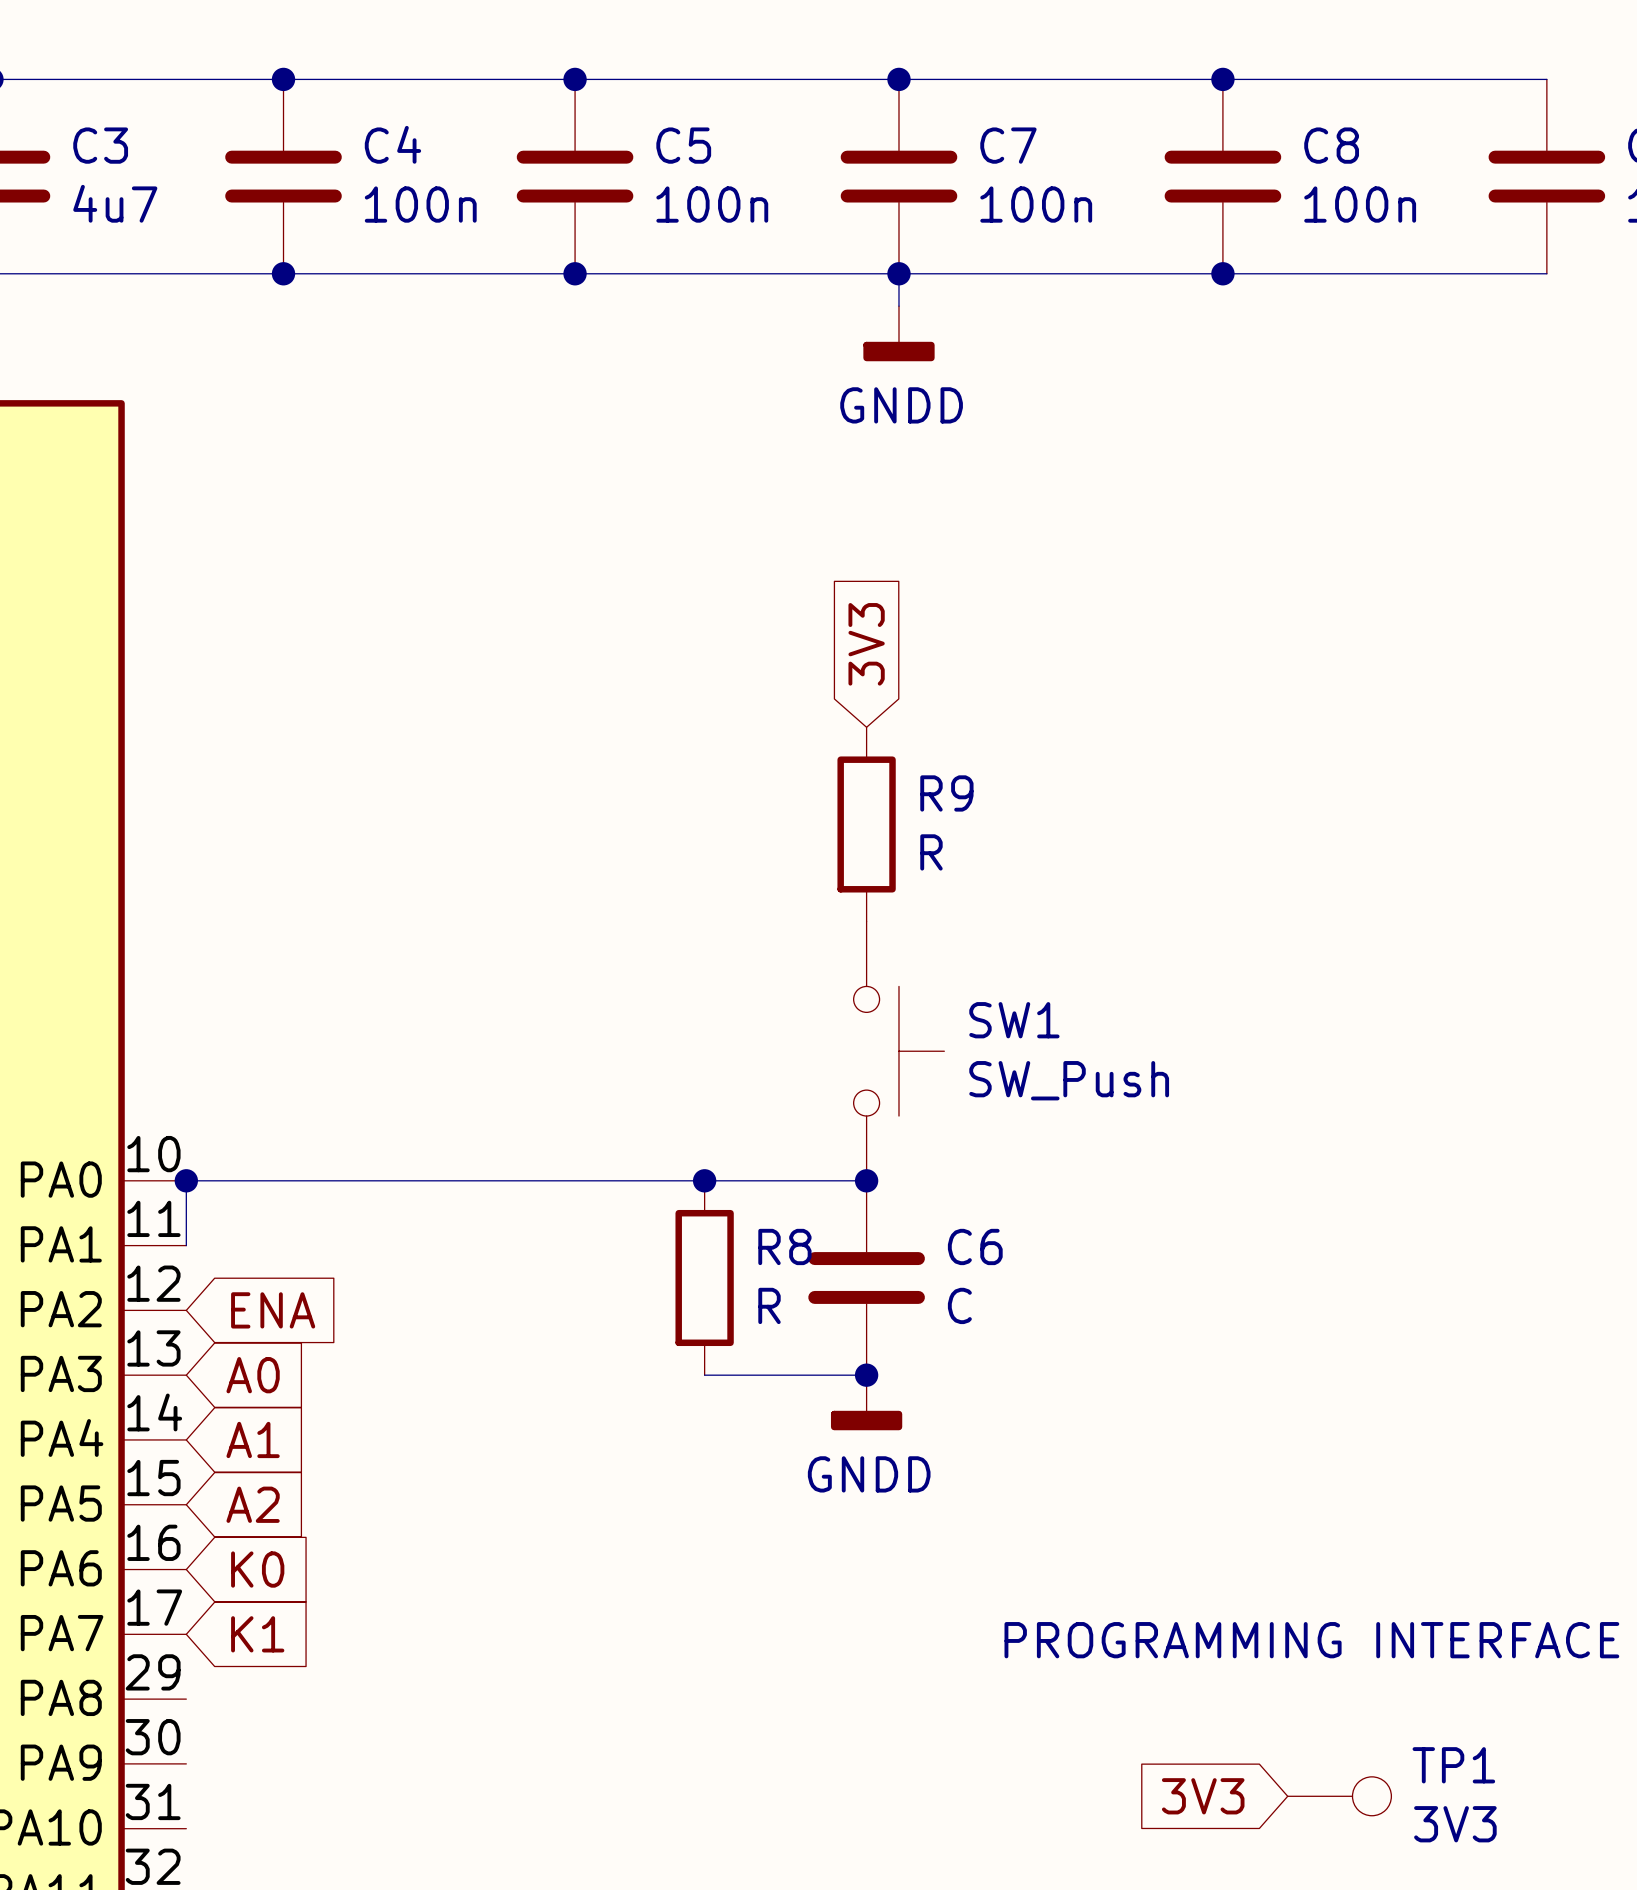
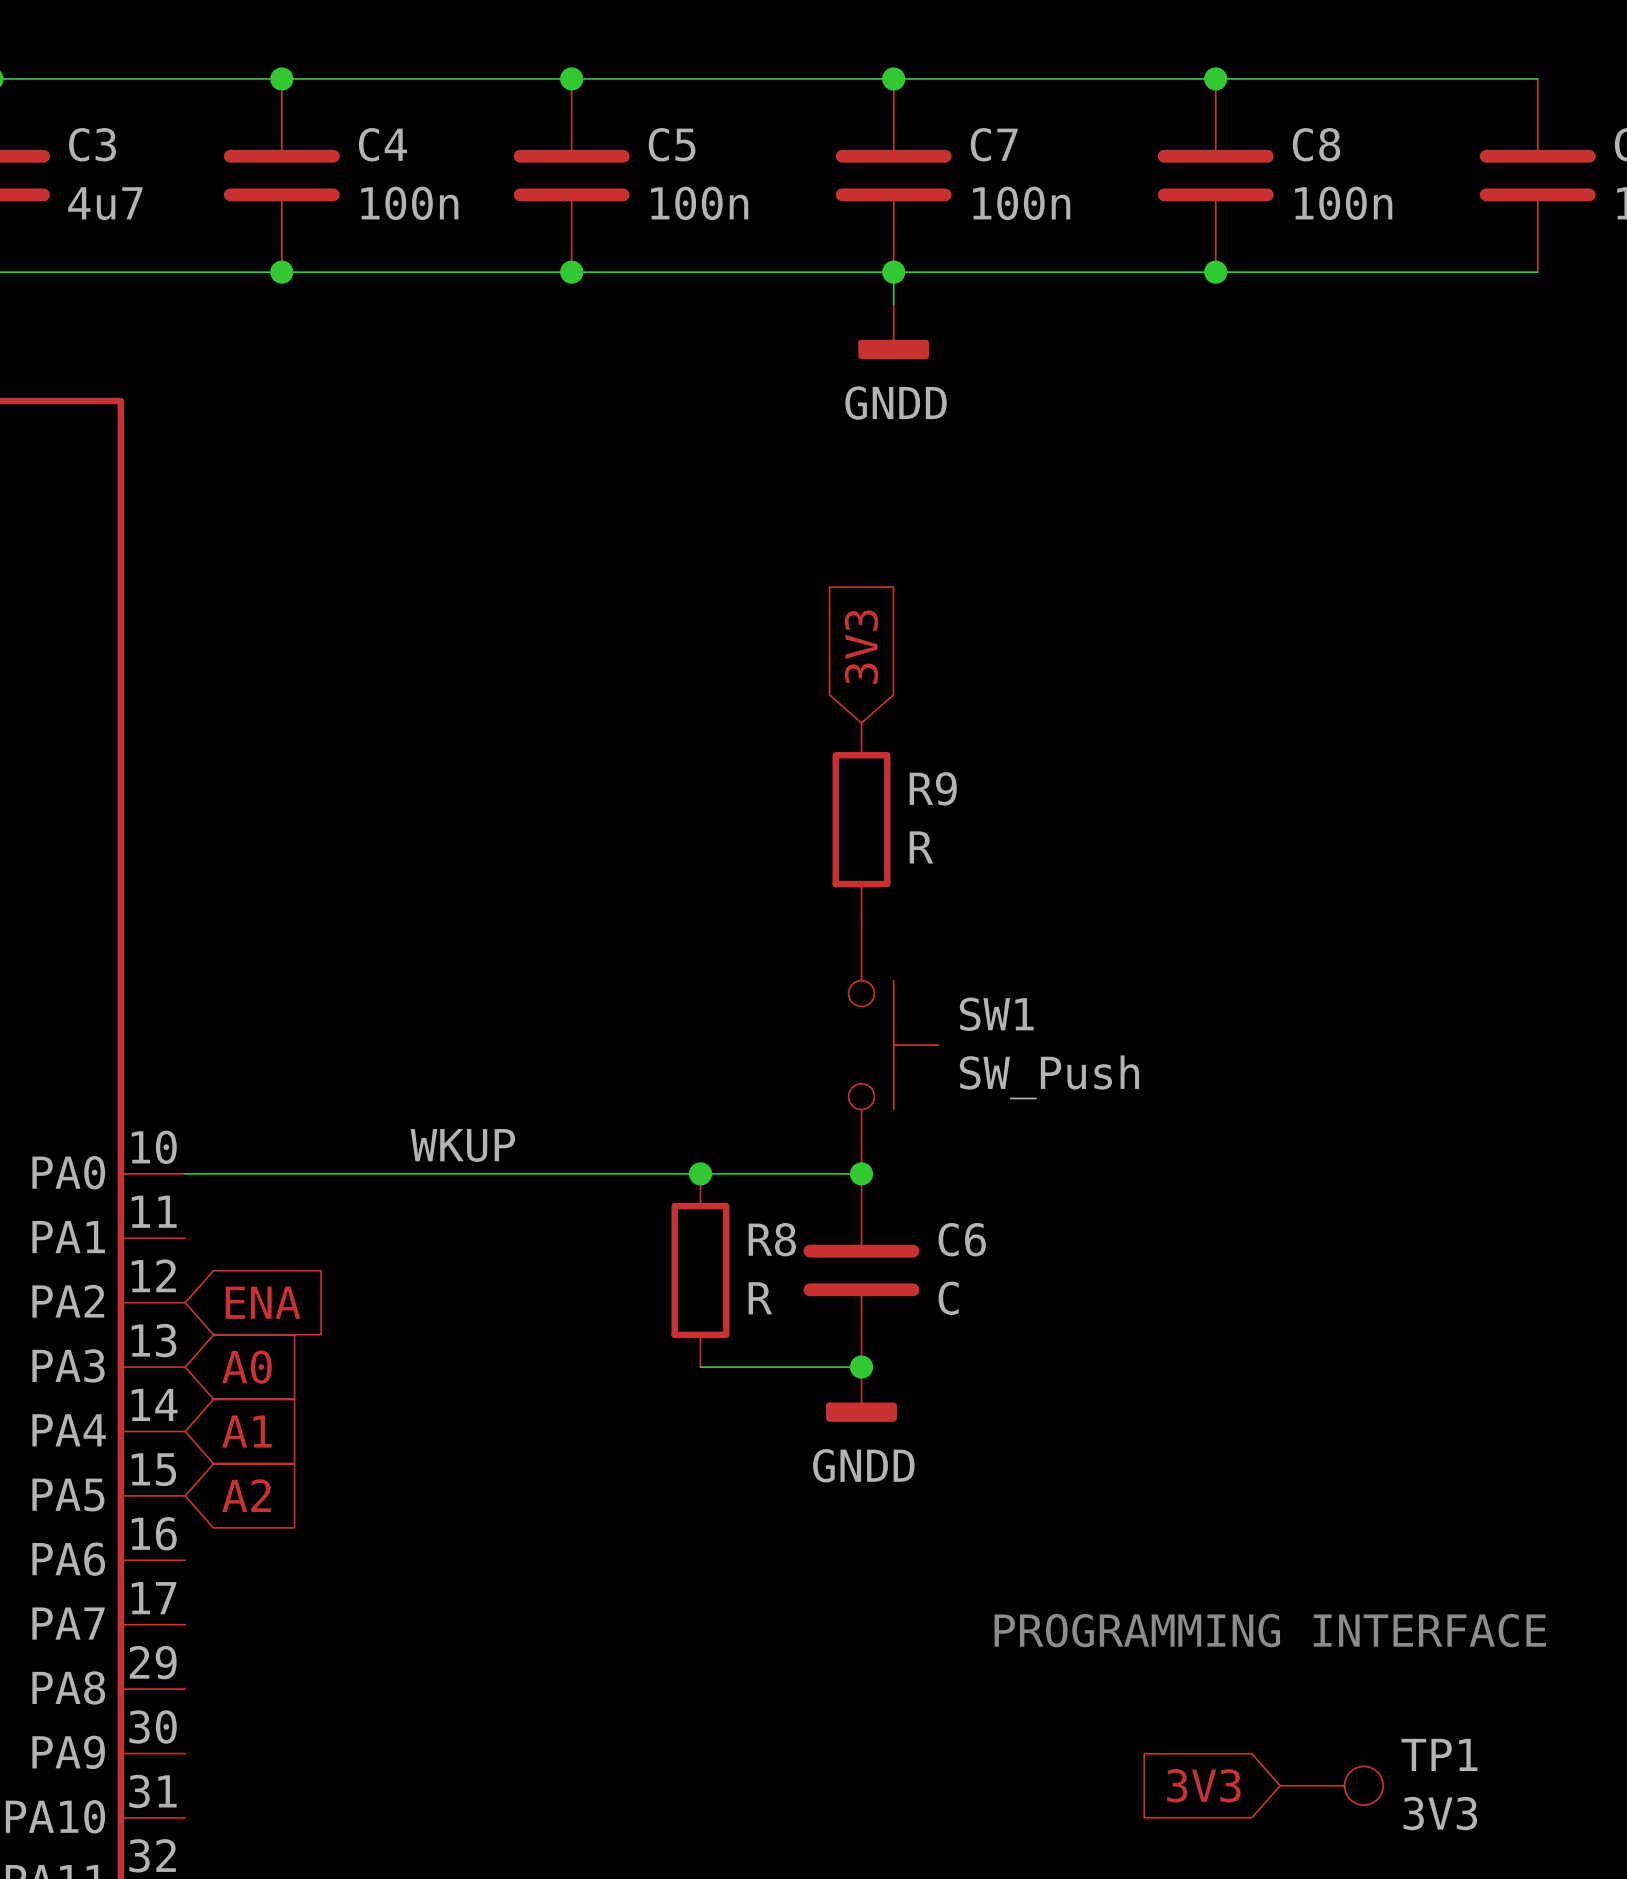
label: none -> WKUP (462, 1145)
wire: (186, 1180) (186, 1245) -> none
junction: (186, 1180) -> none
global label: K0 (257, 1569) -> none
global label: K1 (257, 1634) -> none

